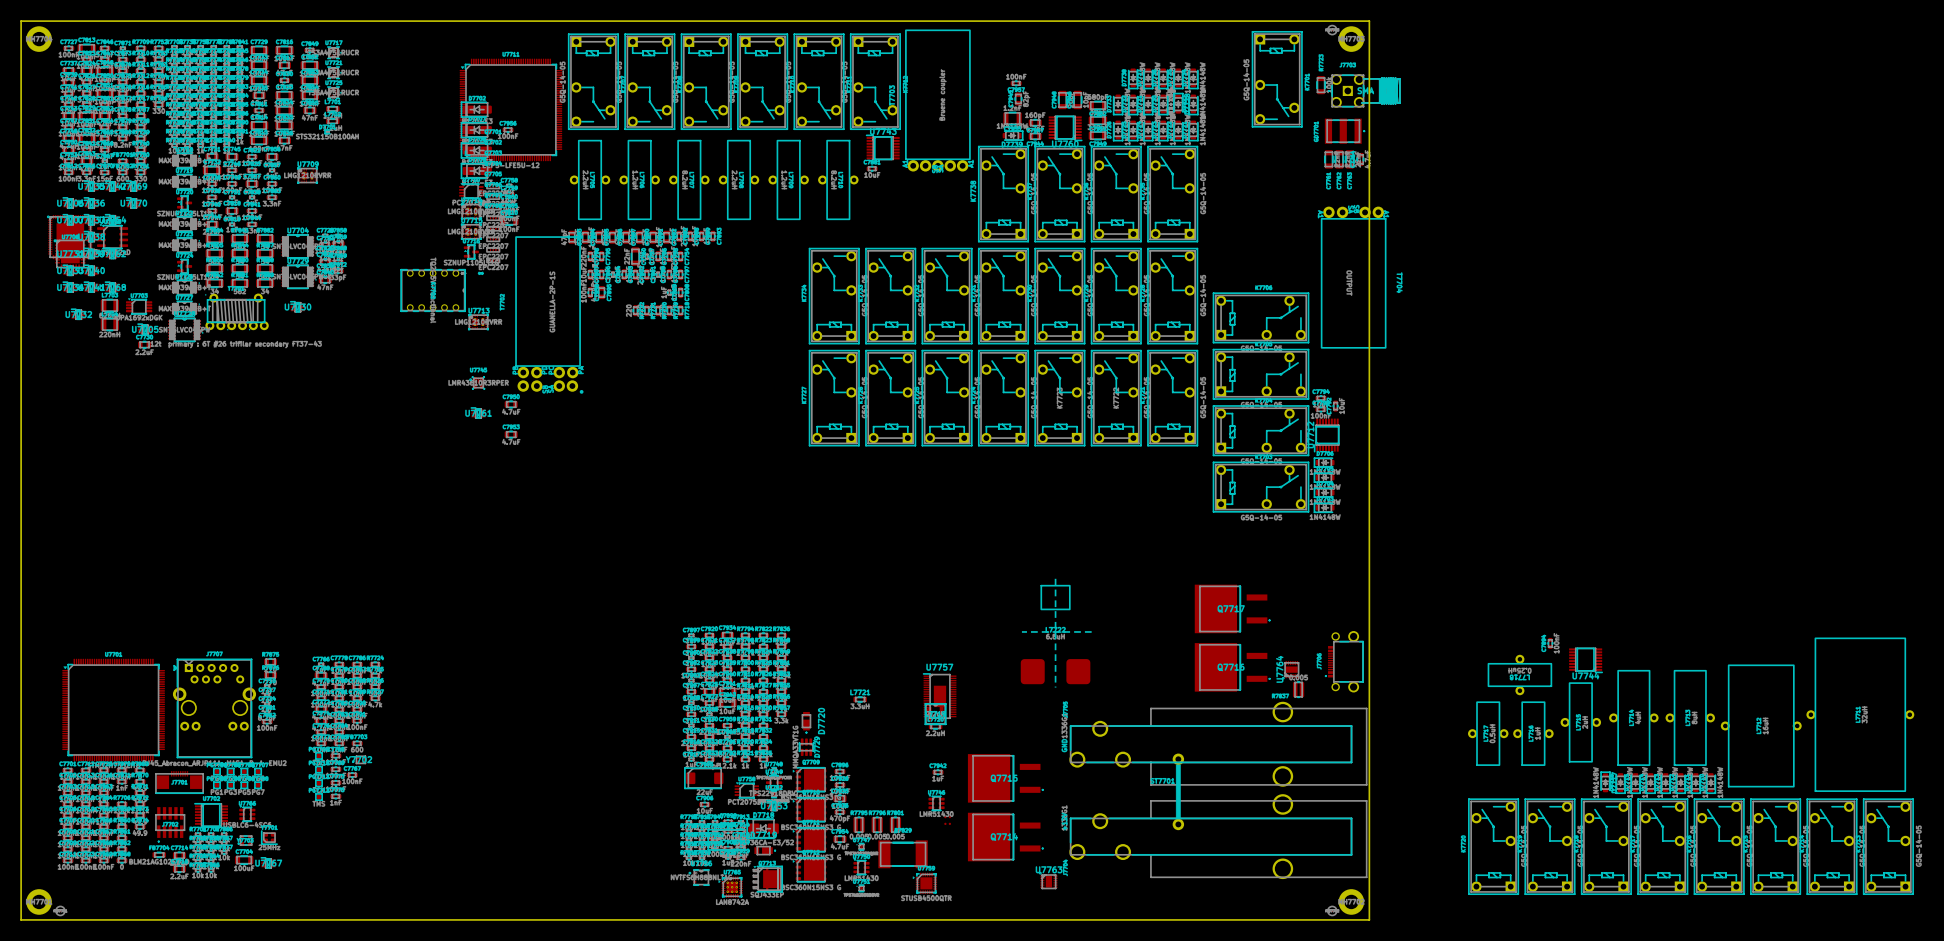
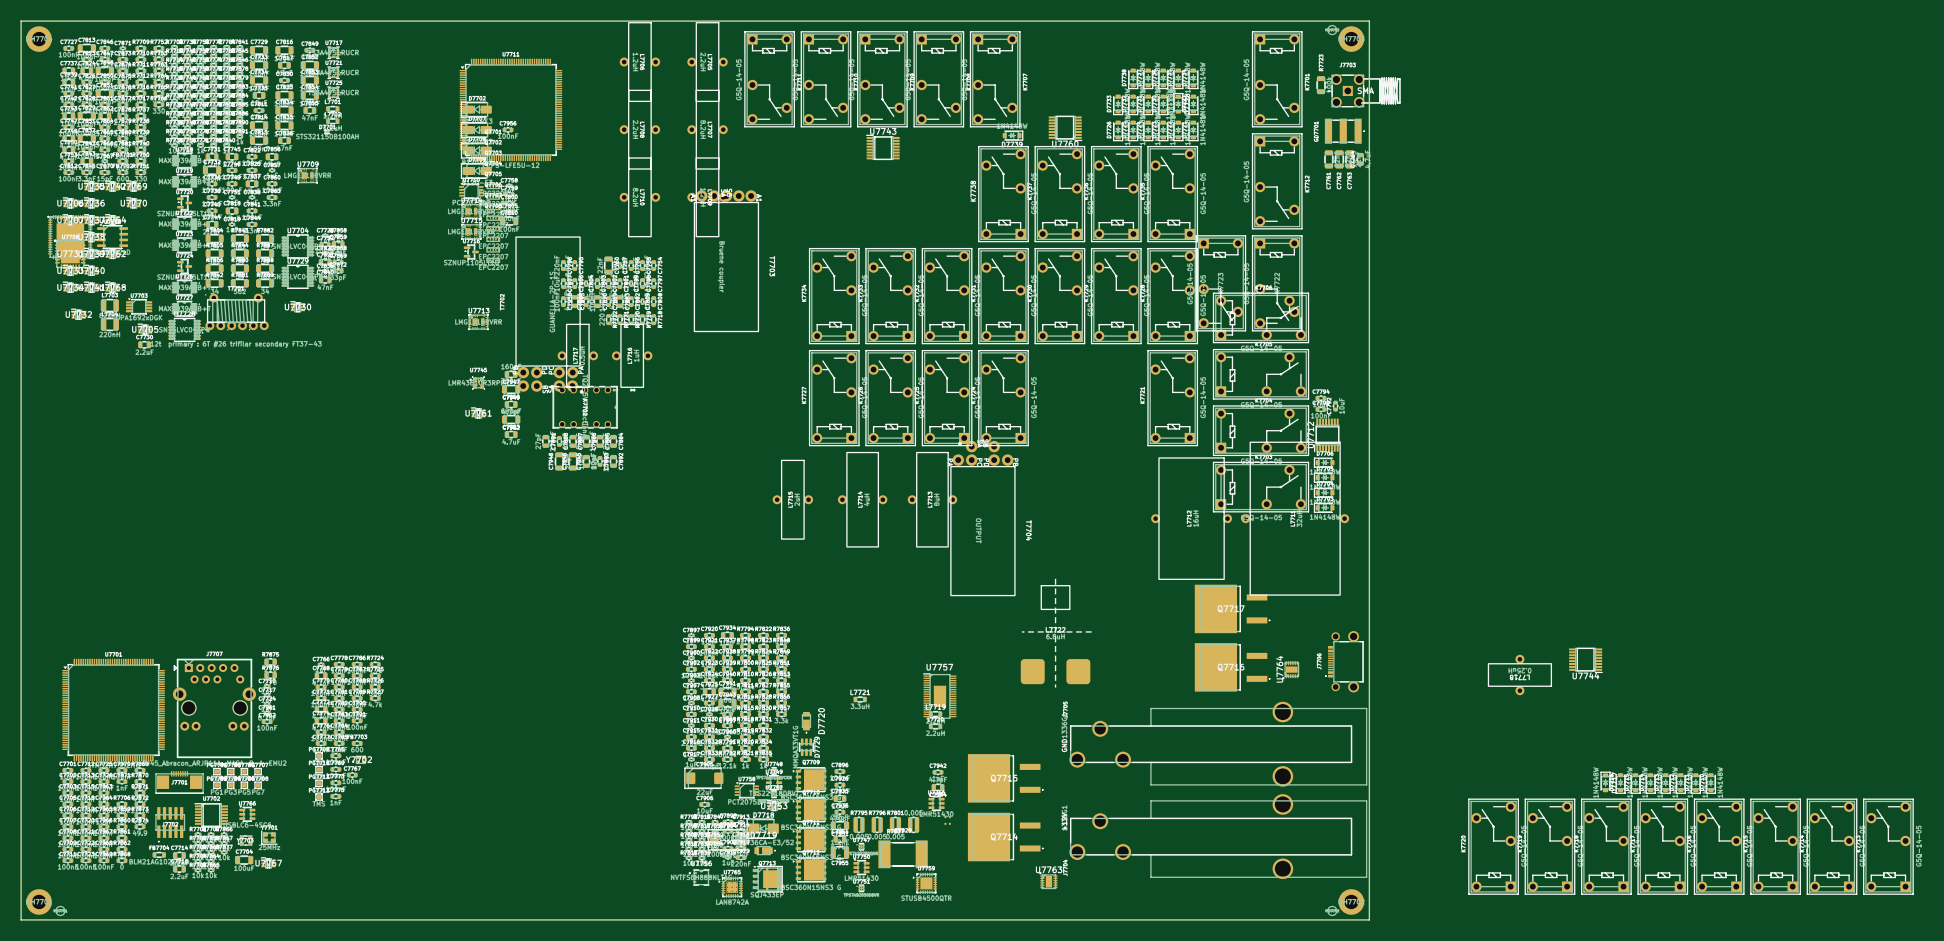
part position: (593, 81) -> (995, 79)
part position: (649, 81) -> (938, 79)
part position: (706, 81) -> (882, 79)
part position: (762, 81) -> (826, 79)
part position: (819, 81) -> (769, 79)
part position: (875, 81) -> (1277, 181)
part position: (1016, 83) -> (727, 714)
part position: (1018, 98) -> (586, 461)
part rotation: 0° (937, 100) -> 180° (726, 260)
part position: (937, 100) -> (726, 260)
part position: (1062, 100) -> (559, 461)
part position: (1077, 100) -> (572, 461)
part position: (1097, 105) -> (511, 419)
part position: (1012, 118) -> (839, 852)
part position: (1097, 120) -> (839, 825)
part position: (1035, 122) -> (511, 374)
part position: (1097, 135) -> (511, 389)
part position: (1035, 136) -> (938, 787)
part position: (872, 168) -> (122, 149)
part position: (590, 179) -> (707, 62)
part position: (639, 179) -> (639, 62)
part position: (689, 179) -> (707, 129)
part position: (738, 179) -> (639, 129)
part position: (788, 179) -> (707, 197)
part position: (838, 179) -> (639, 197)
part footprint: [1321, 206, 1386, 349] -> [950, 440, 1016, 596]
part position: (679, 236) -> (631, 301)
part position: (690, 236) -> (559, 441)
part position: (701, 236) -> (608, 301)
part position: (712, 236) -> (600, 461)
part position: (571, 237) -> (619, 301)
part position: (585, 237) -> (613, 441)
part position: (599, 237) -> (600, 441)
part position: (612, 237) -> (586, 441)
part position: (626, 237) -> (572, 441)
part position: (639, 237) -> (597, 301)
part position: (653, 237) -> (545, 441)
part position: (666, 237) -> (613, 461)
part position: (590, 256) -> (563, 265)
part position: (601, 256) -> (574, 265)
part position: (635, 256) -> (608, 265)
part position: (646, 256) -> (619, 265)
part position: (658, 256) -> (631, 265)
part position: (669, 256) -> (642, 265)
part position: (680, 256) -> (653, 265)
part position: (590, 274) -> (563, 283)
part position: (601, 274) -> (574, 283)
part position: (612, 274) -> (586, 283)
part position: (624, 274) -> (597, 283)
part position: (635, 274) -> (608, 283)
part position: (646, 274) -> (619, 283)
part position: (658, 274) -> (631, 283)
part position: (669, 274) -> (642, 283)
part position: (680, 274) -> (653, 283)
part position: (433, 290) -> (585, 407)
part position: (590, 292) -> (563, 301)
part position: (601, 292) -> (574, 301)
part position: (669, 292) -> (642, 301)
part position: (680, 292) -> (653, 301)
part position: (635, 310) -> (608, 319)
part position: (646, 310) -> (619, 319)
part position: (658, 310) -> (631, 319)
part position: (669, 310) -> (642, 319)
part position: (680, 310) -> (653, 319)
part rotation: 0° (1059, 398) -> 180° (1220, 283)
part position: (1059, 398) -> (1220, 283)
part rotation: 0° (1116, 398) -> 180° (1277, 283)
part position: (1116, 398) -> (1277, 283)
part position: (1550, 643) -> (586, 301)
part position: (1298, 689) -> (913, 824)
part footprint: [925, 703, 947, 725] -> [928, 711, 943, 717]
part position: (1860, 714) -> (1295, 518)
part position: (1633, 717) -> (862, 499)
part position: (1690, 717) -> (932, 499)
part position: (1580, 722) -> (792, 499)
part position: (1761, 725) -> (1191, 518)
part position: (1488, 733) -> (577, 355)
part position: (1533, 733) -> (632, 355)
part: (1178, 791) -> none

